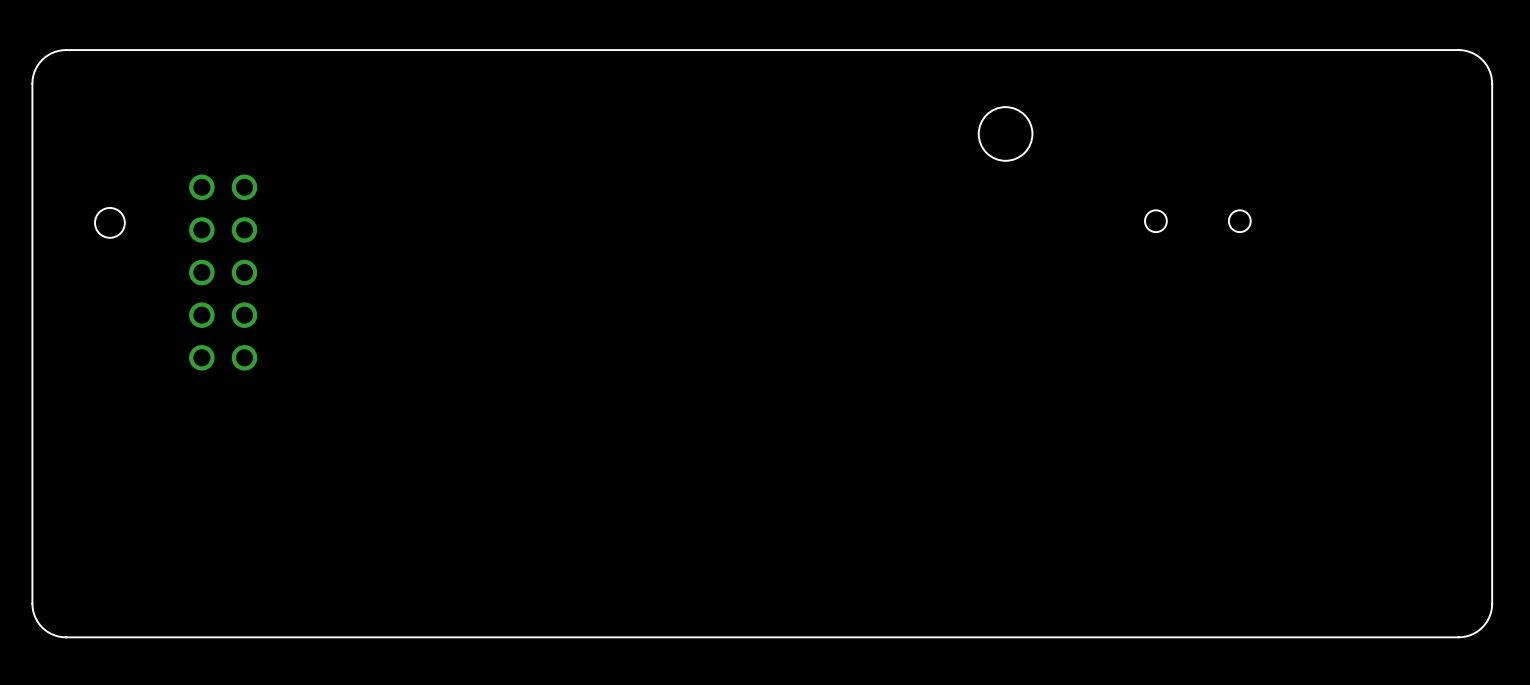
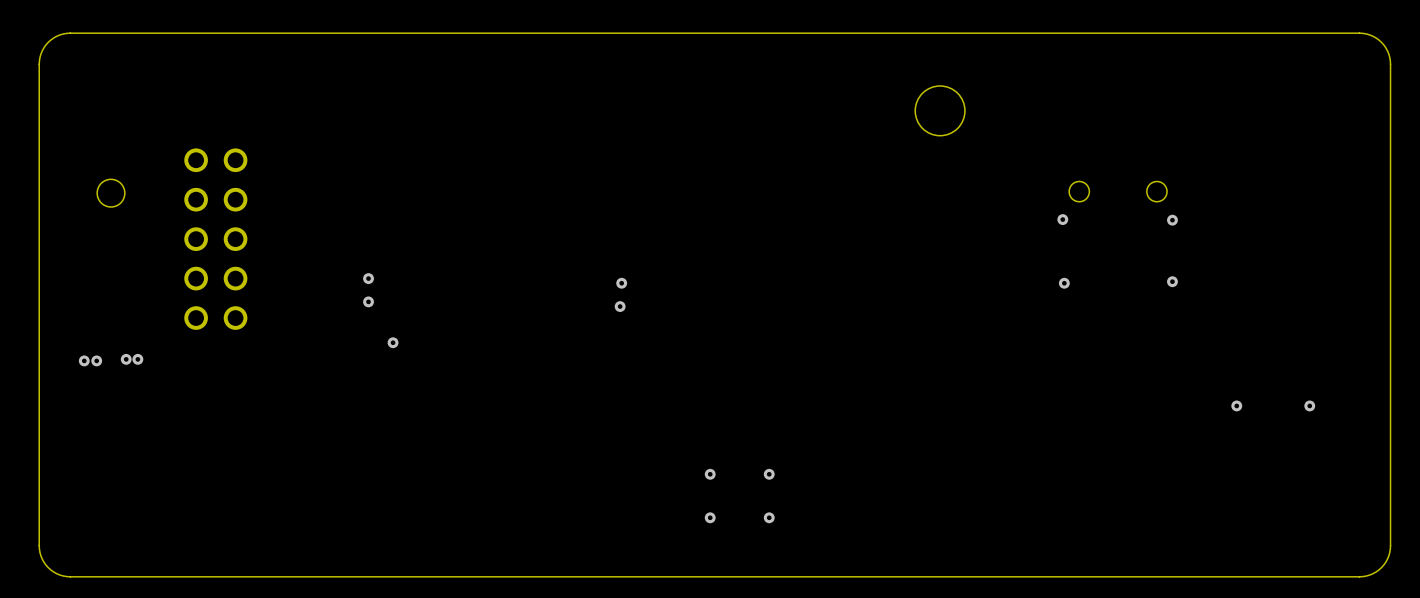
via: none -> (1062, 219)
via: none -> (1172, 220)
via: none -> (368, 278)
via: none -> (1172, 281)
via: none -> (621, 283)
via: none -> (1064, 283)
via: none -> (368, 301)
via: none -> (620, 306)
via: none -> (393, 342)
via: none -> (126, 359)
via: none -> (137, 359)
via: none -> (84, 360)
via: none -> (96, 360)
via: none -> (1236, 405)
via: none -> (1309, 405)
via: none -> (710, 474)
via: none -> (769, 474)
via: none -> (710, 517)
via: none -> (769, 517)

